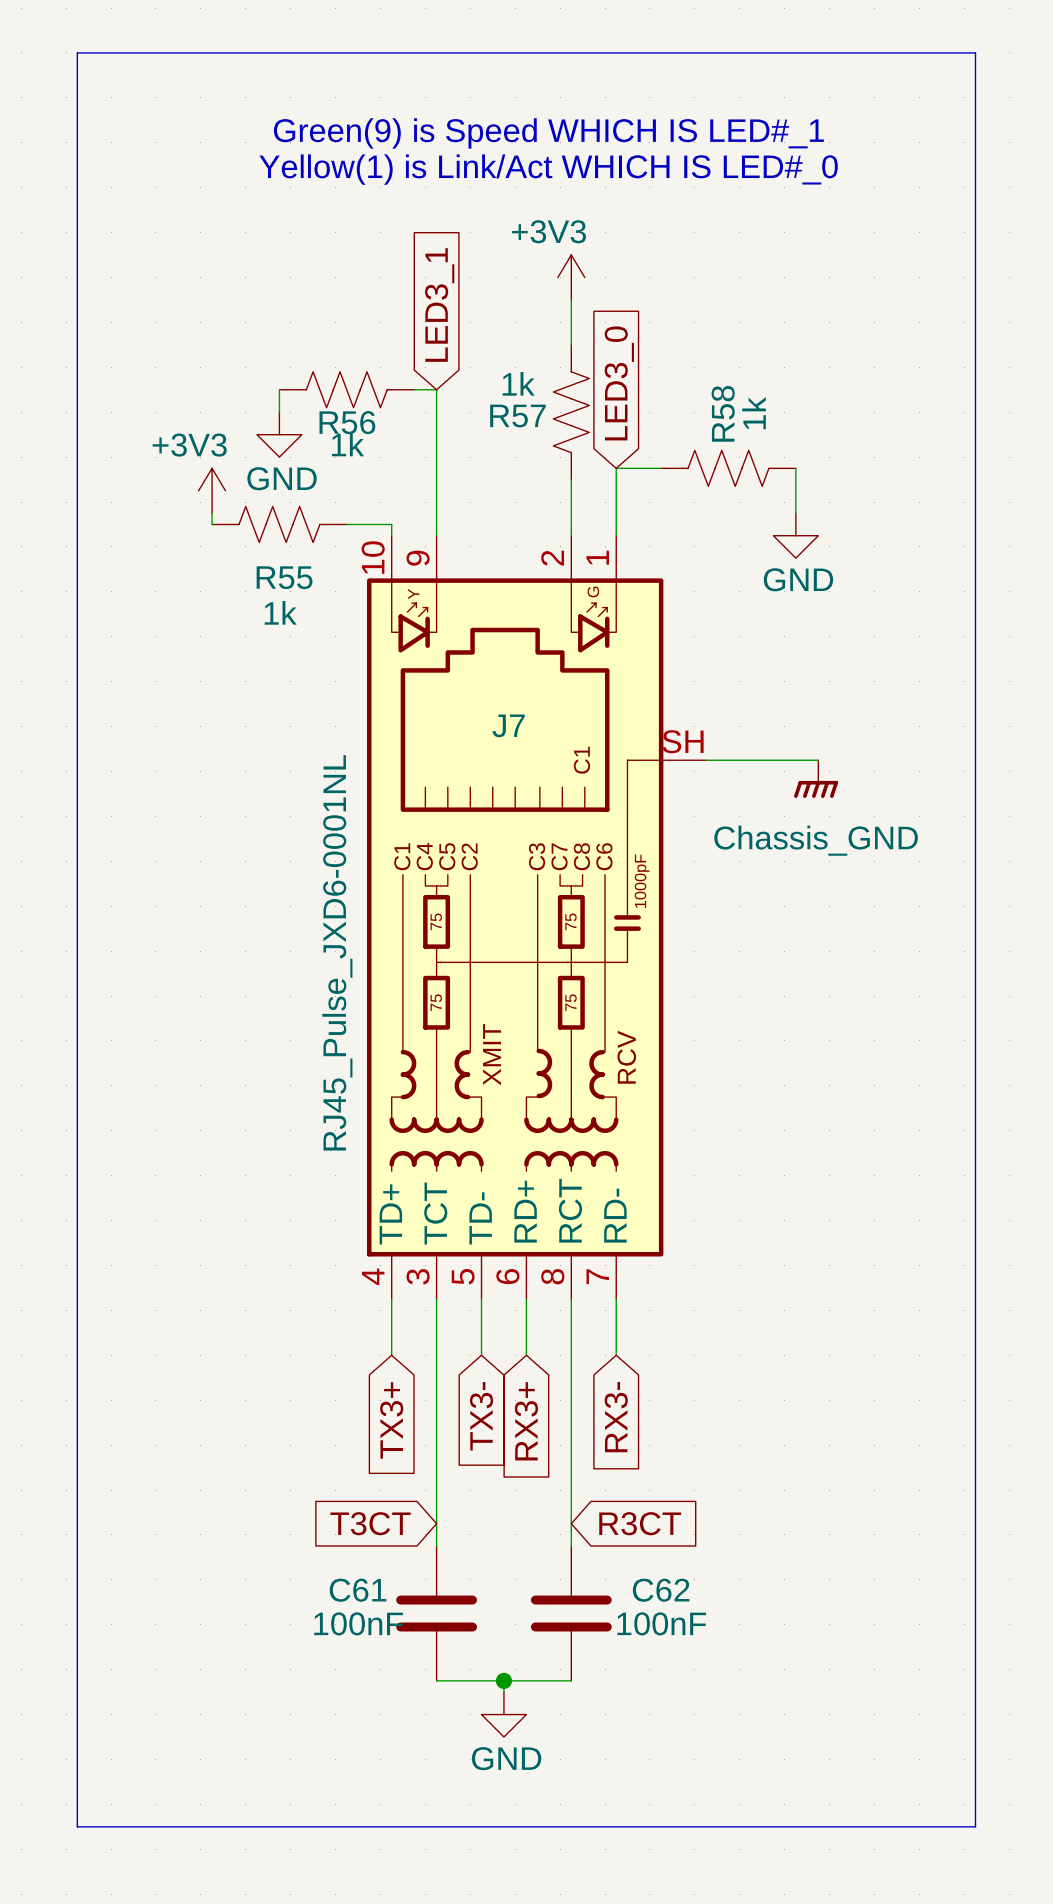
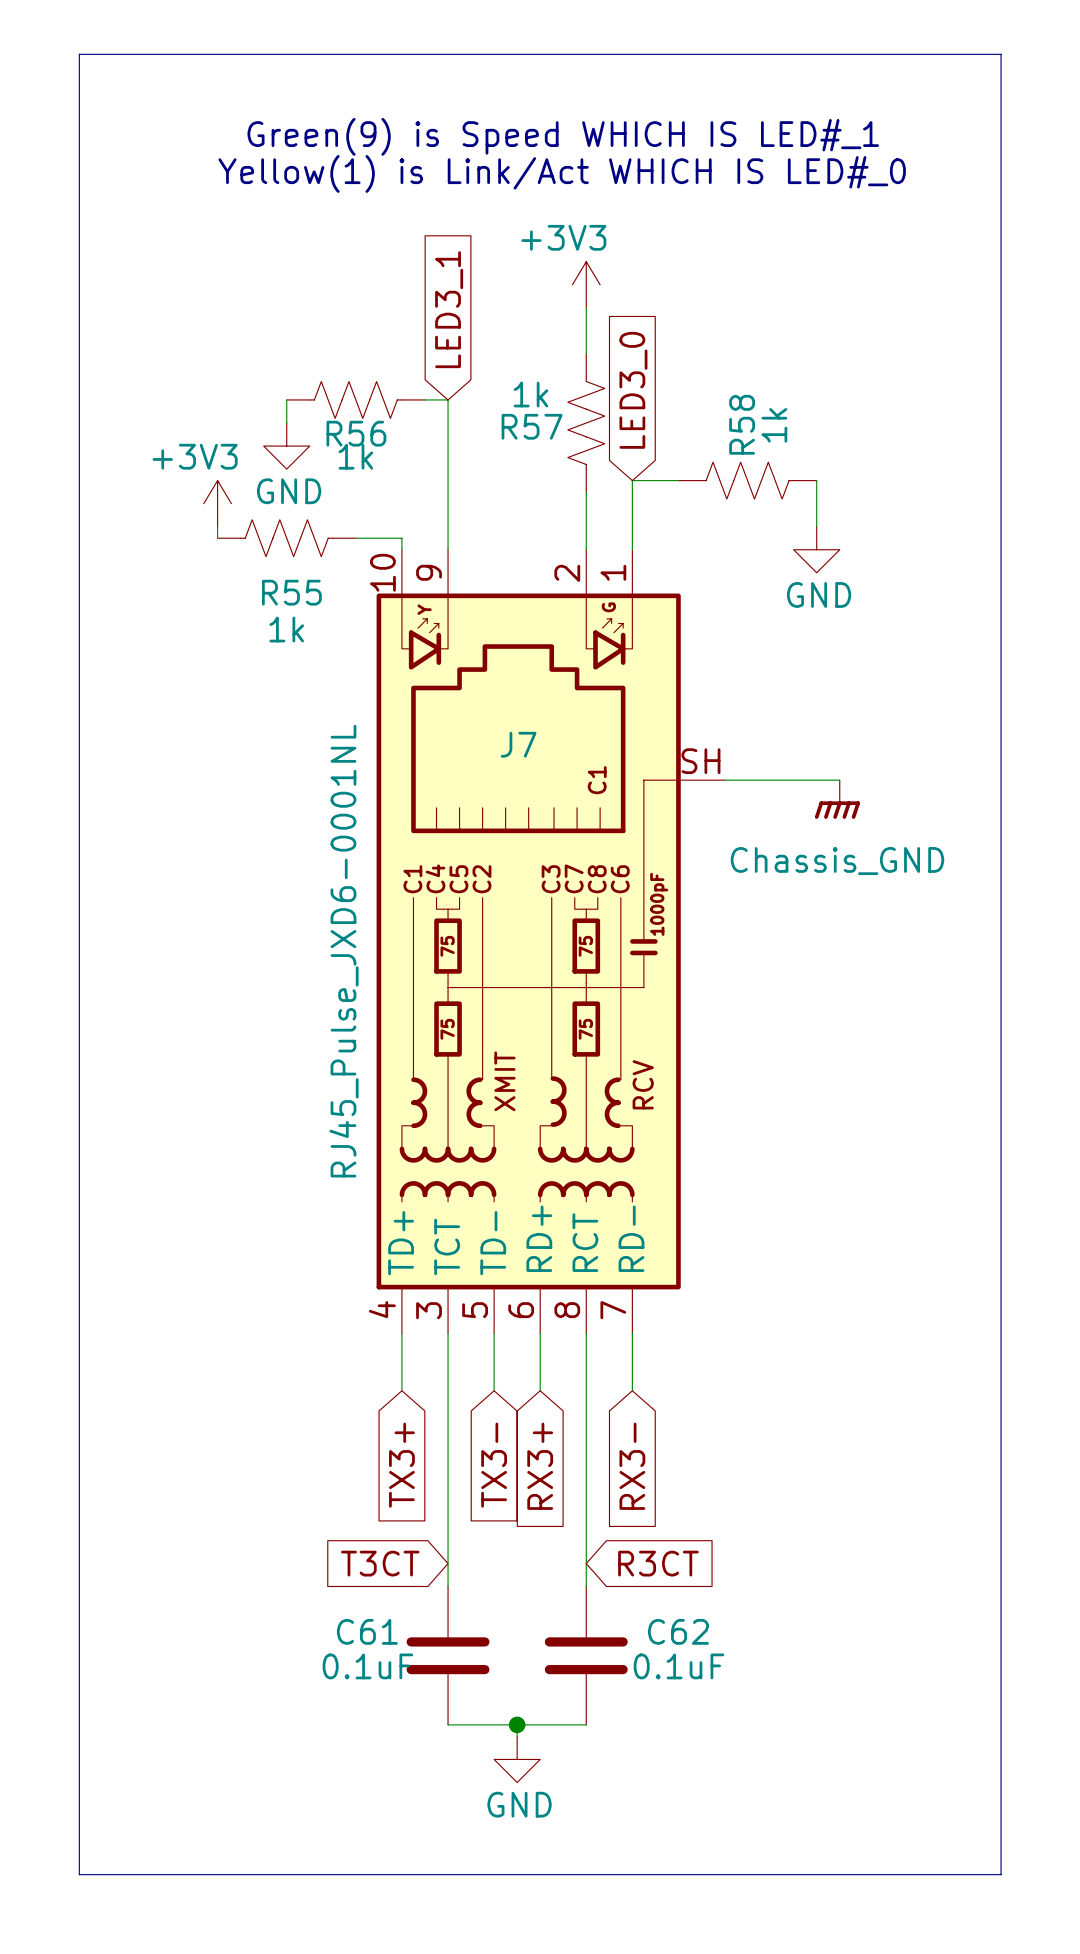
C61 value: 100nF (358, 1623) -> 0.1uF (367, 1666)
C62 value: 100nF (661, 1623) -> 0.1uF (679, 1666)

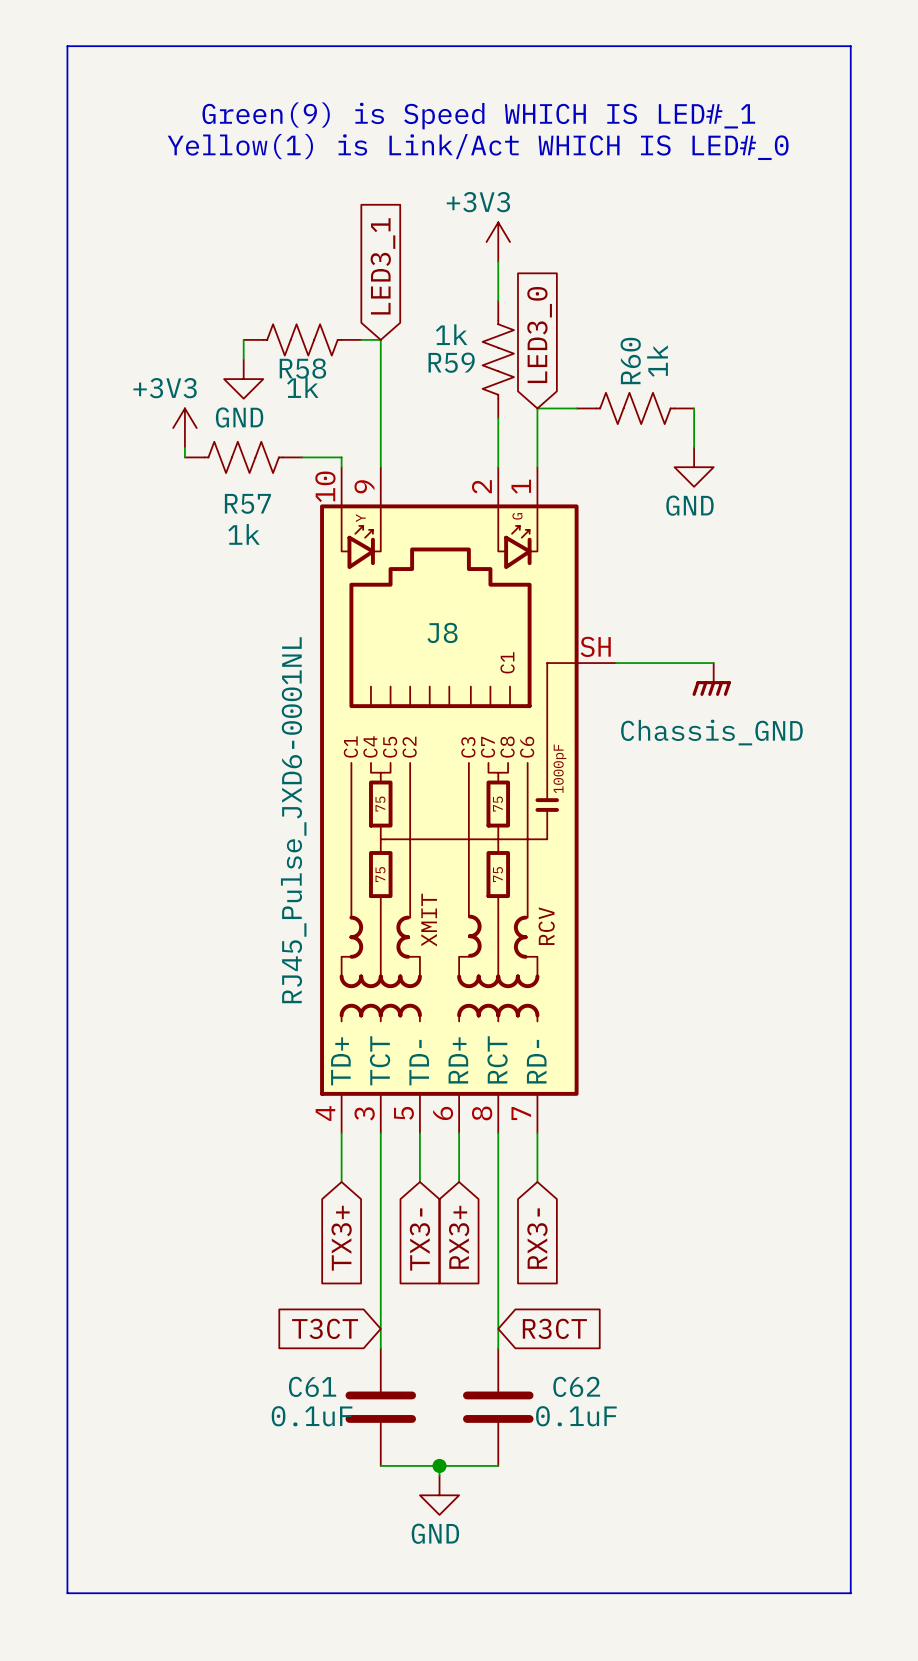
R58 name: R58 (742, 424) -> R60 (630, 360)
R57 name: R57 (532, 426) -> R59 (451, 362)
R56 name: R56 (356, 433) -> R58 (302, 368)
R55 name: R55 (291, 592) -> R57 (247, 503)
J7 name: J7 (518, 744) -> J8 (442, 632)

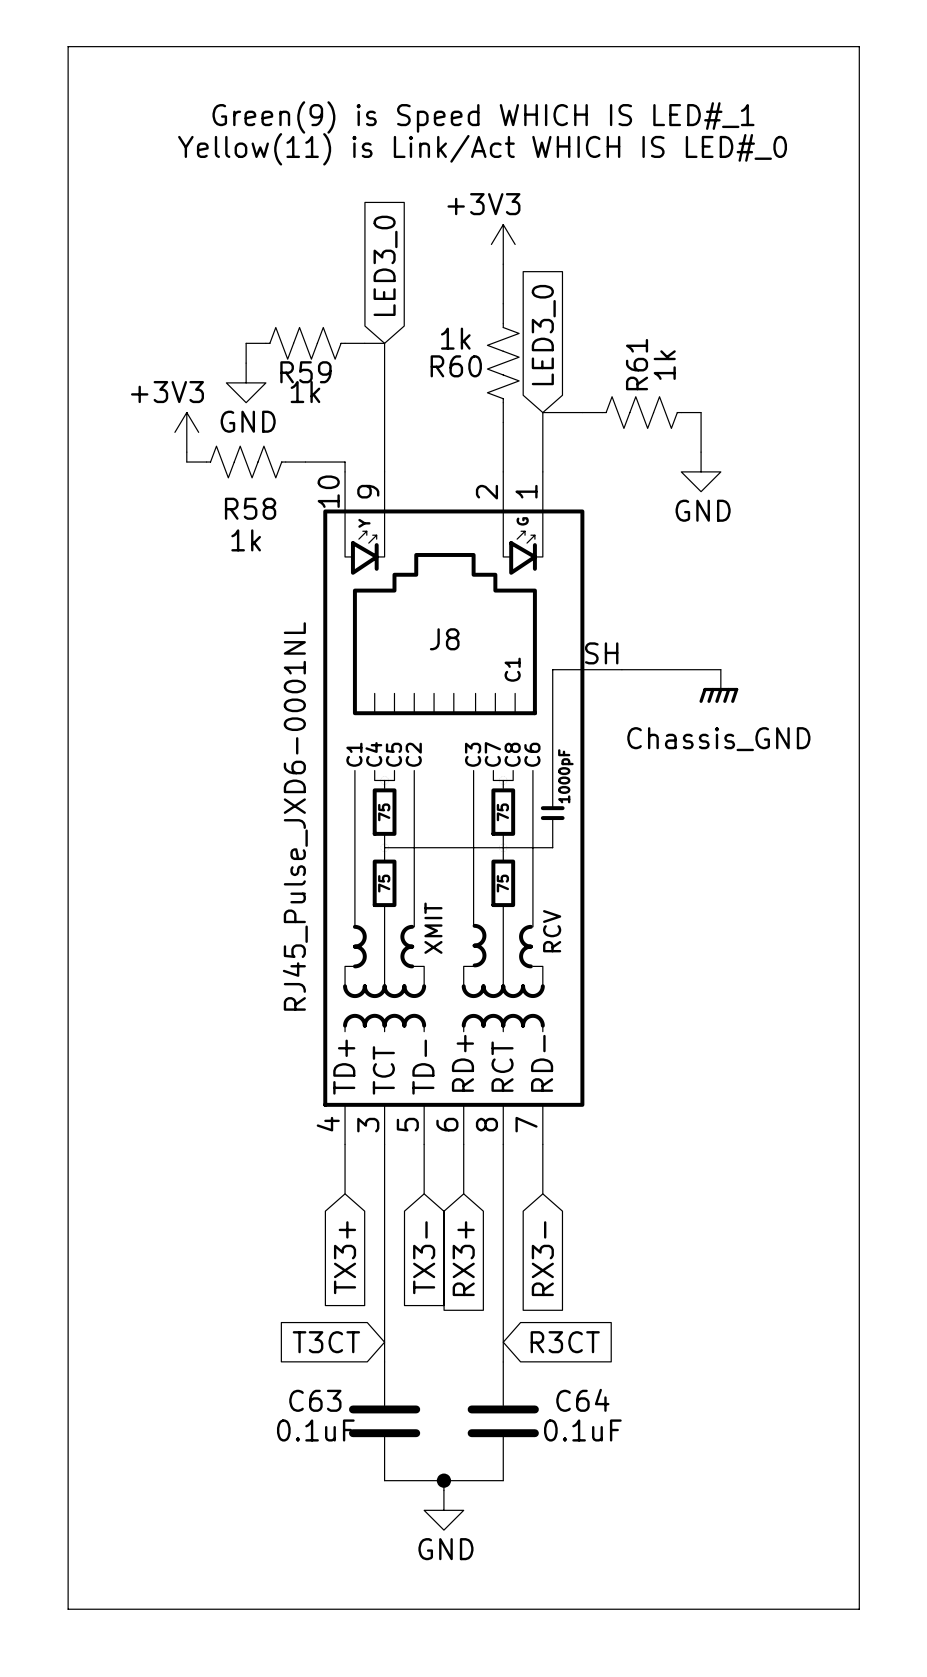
text: Yellow(1) is Link/Act WHICH IS LED#_0 (478, 146) -> Yellow(11) is Link/Act WHICH IS LED#_0 (482, 149)
global label: LED3_1 (382, 266) -> LED3_0 (385, 265)
R60 name: R60 (630, 360) -> R61 (637, 364)
R59 name: R59 (451, 362) -> R60 (456, 366)
R58 name: R58 (302, 368) -> R59 (305, 372)
R57 name: R57 (247, 503) -> R58 (250, 508)
C61 name: C61 (312, 1386) -> C63 (315, 1400)
C62 name: C62 (576, 1386) -> C64 (582, 1400)

